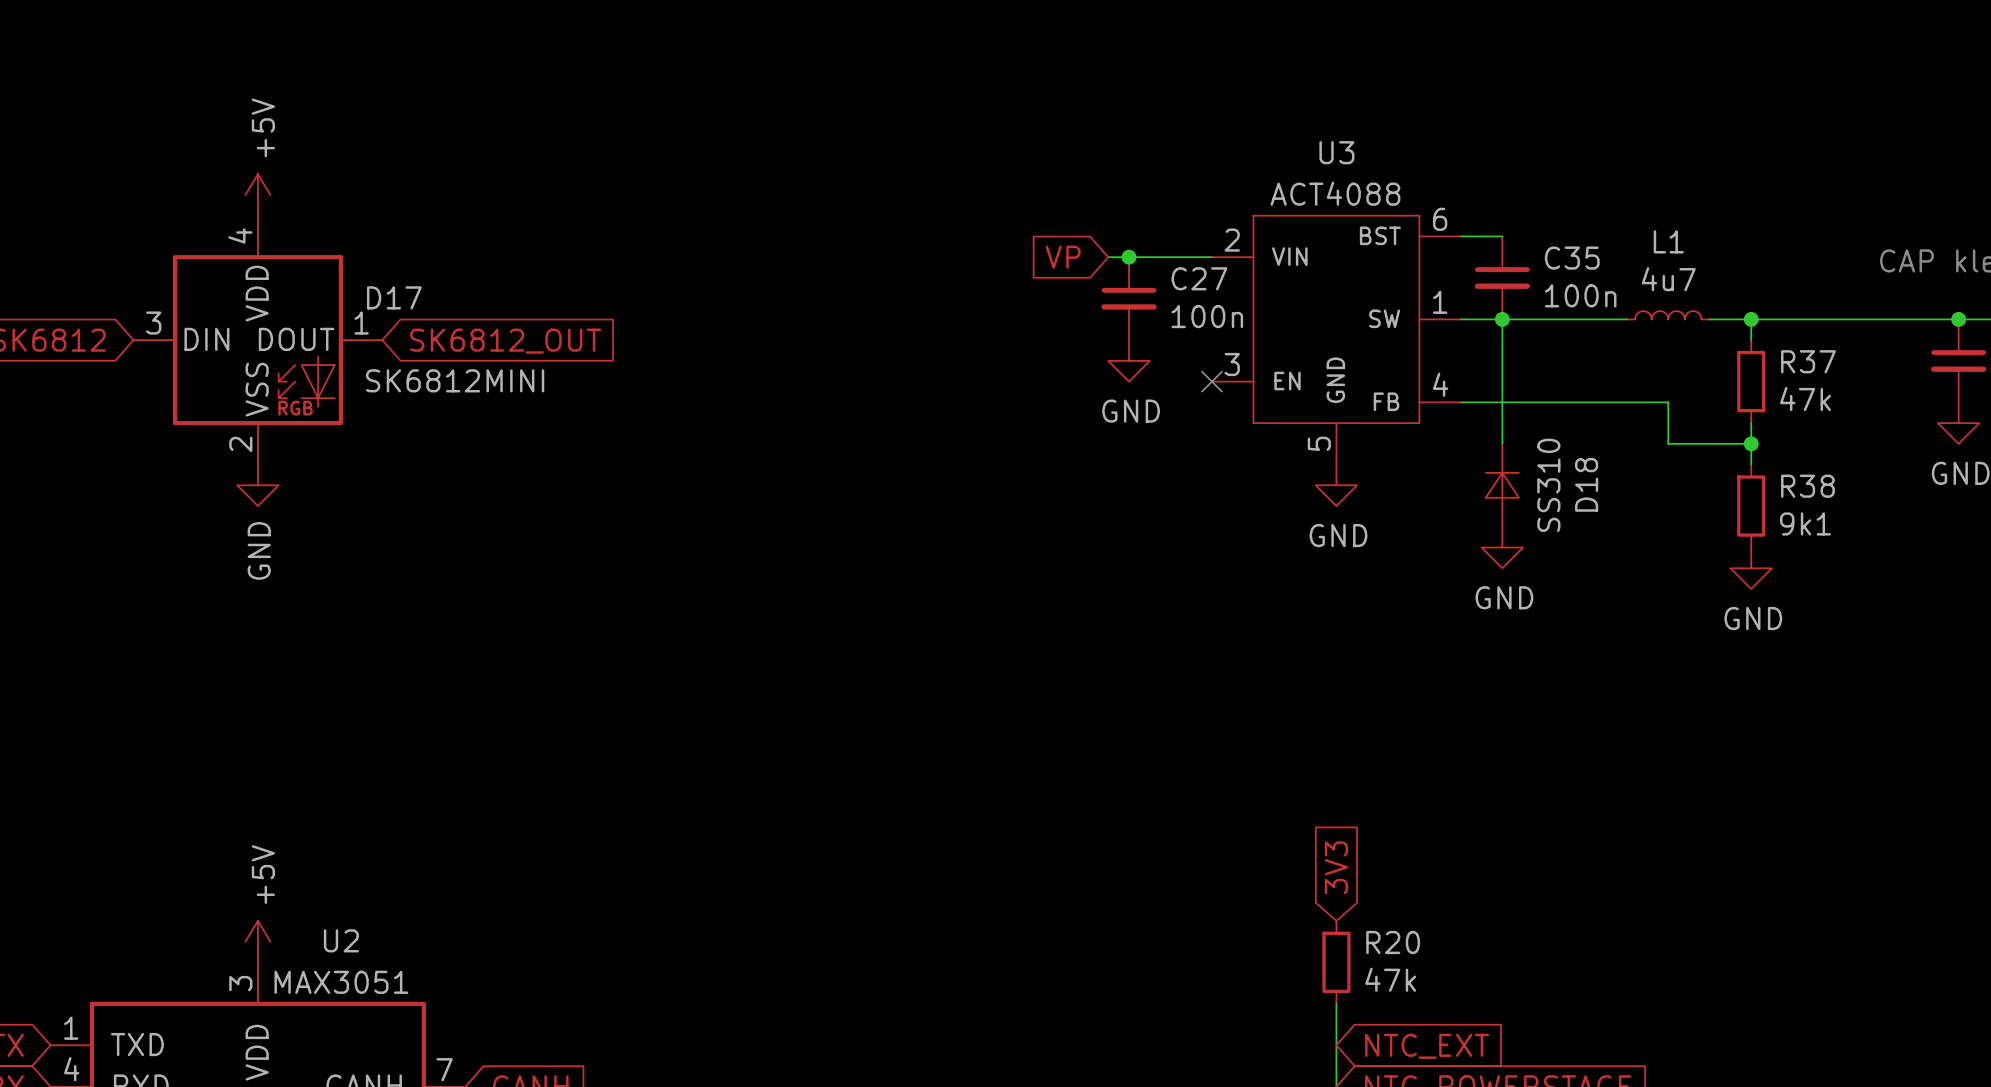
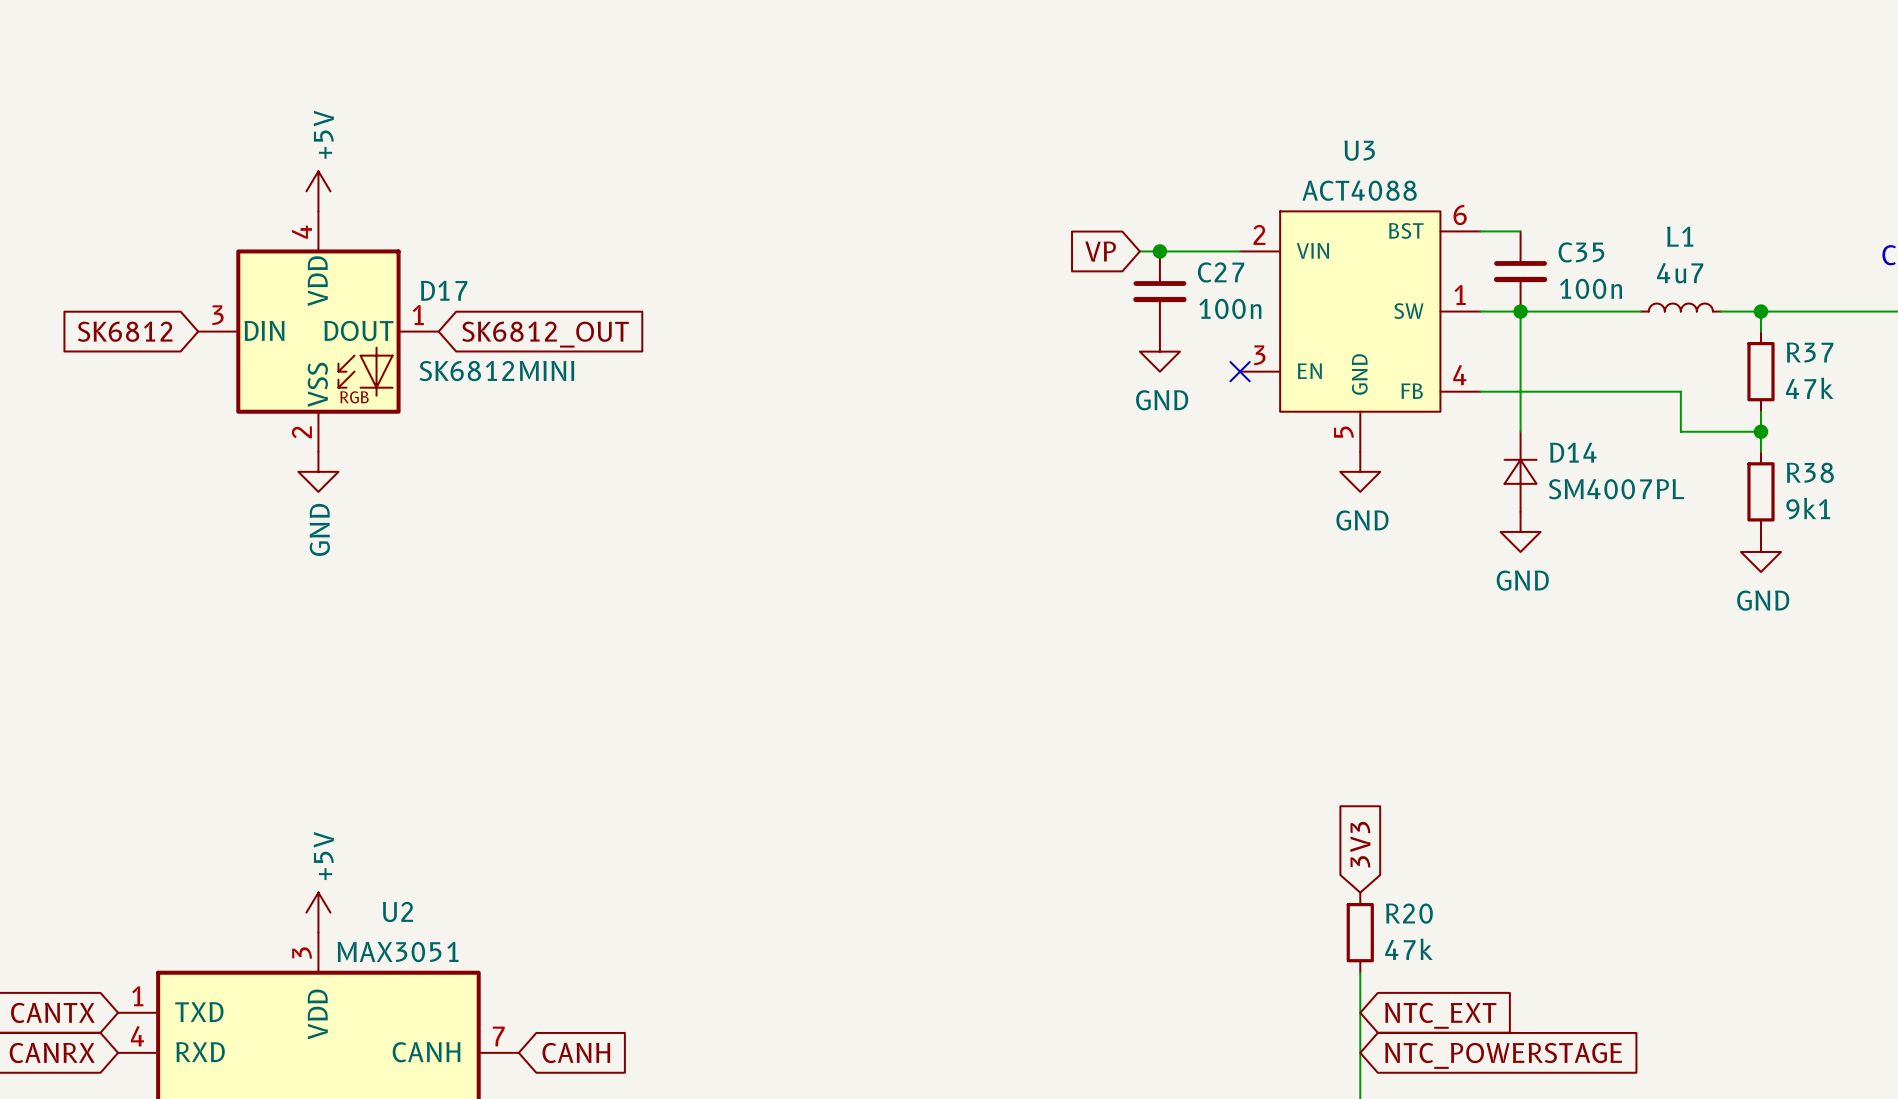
D18 name: D18 (1586, 484) -> D14 (1573, 452)
D18 value: SS310 (1548, 485) -> SM4007PL (1616, 489)

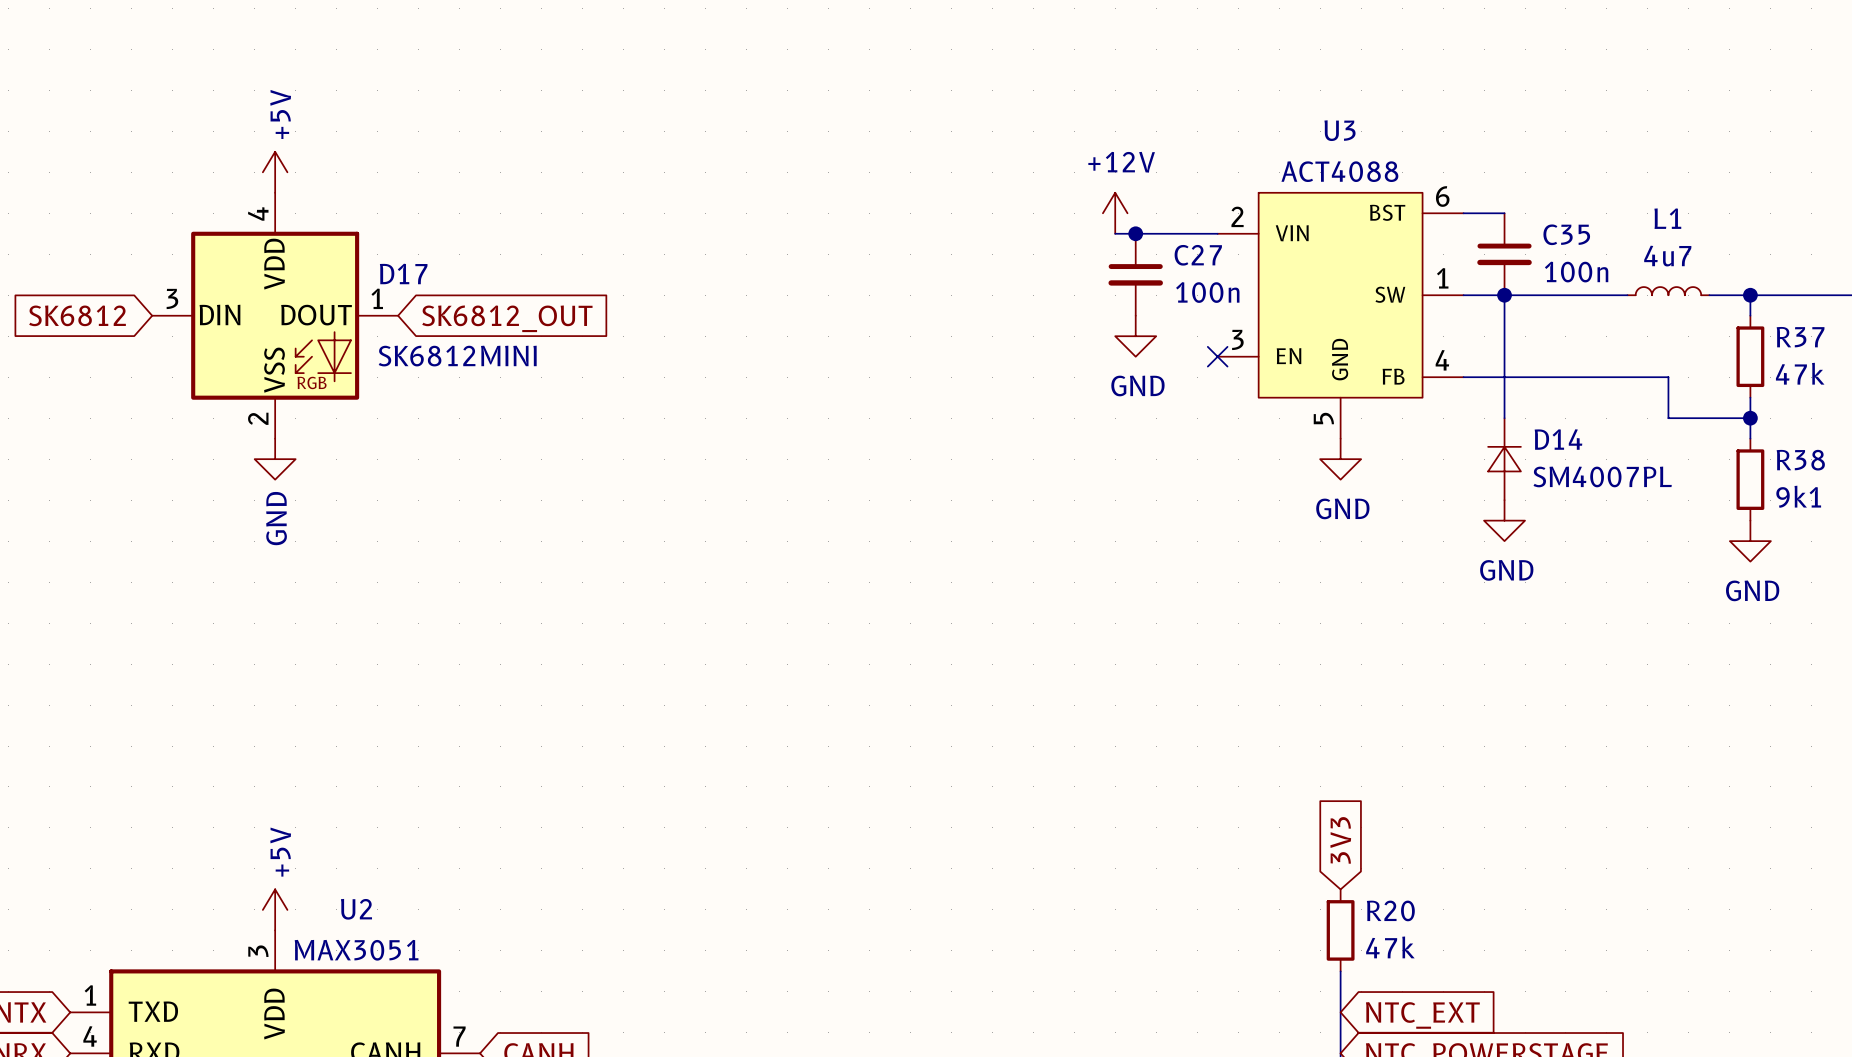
power symbol: none -> +12V (1115, 213)
global label: VP (1100, 251) -> none

